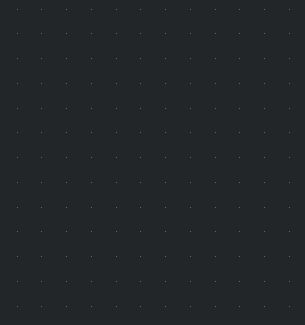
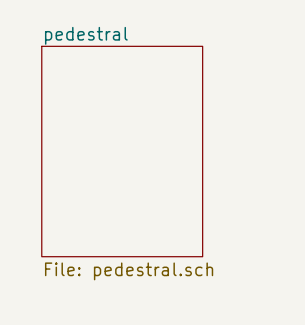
sheet pedestral: none -> File: pedestral.sch (122, 151)

